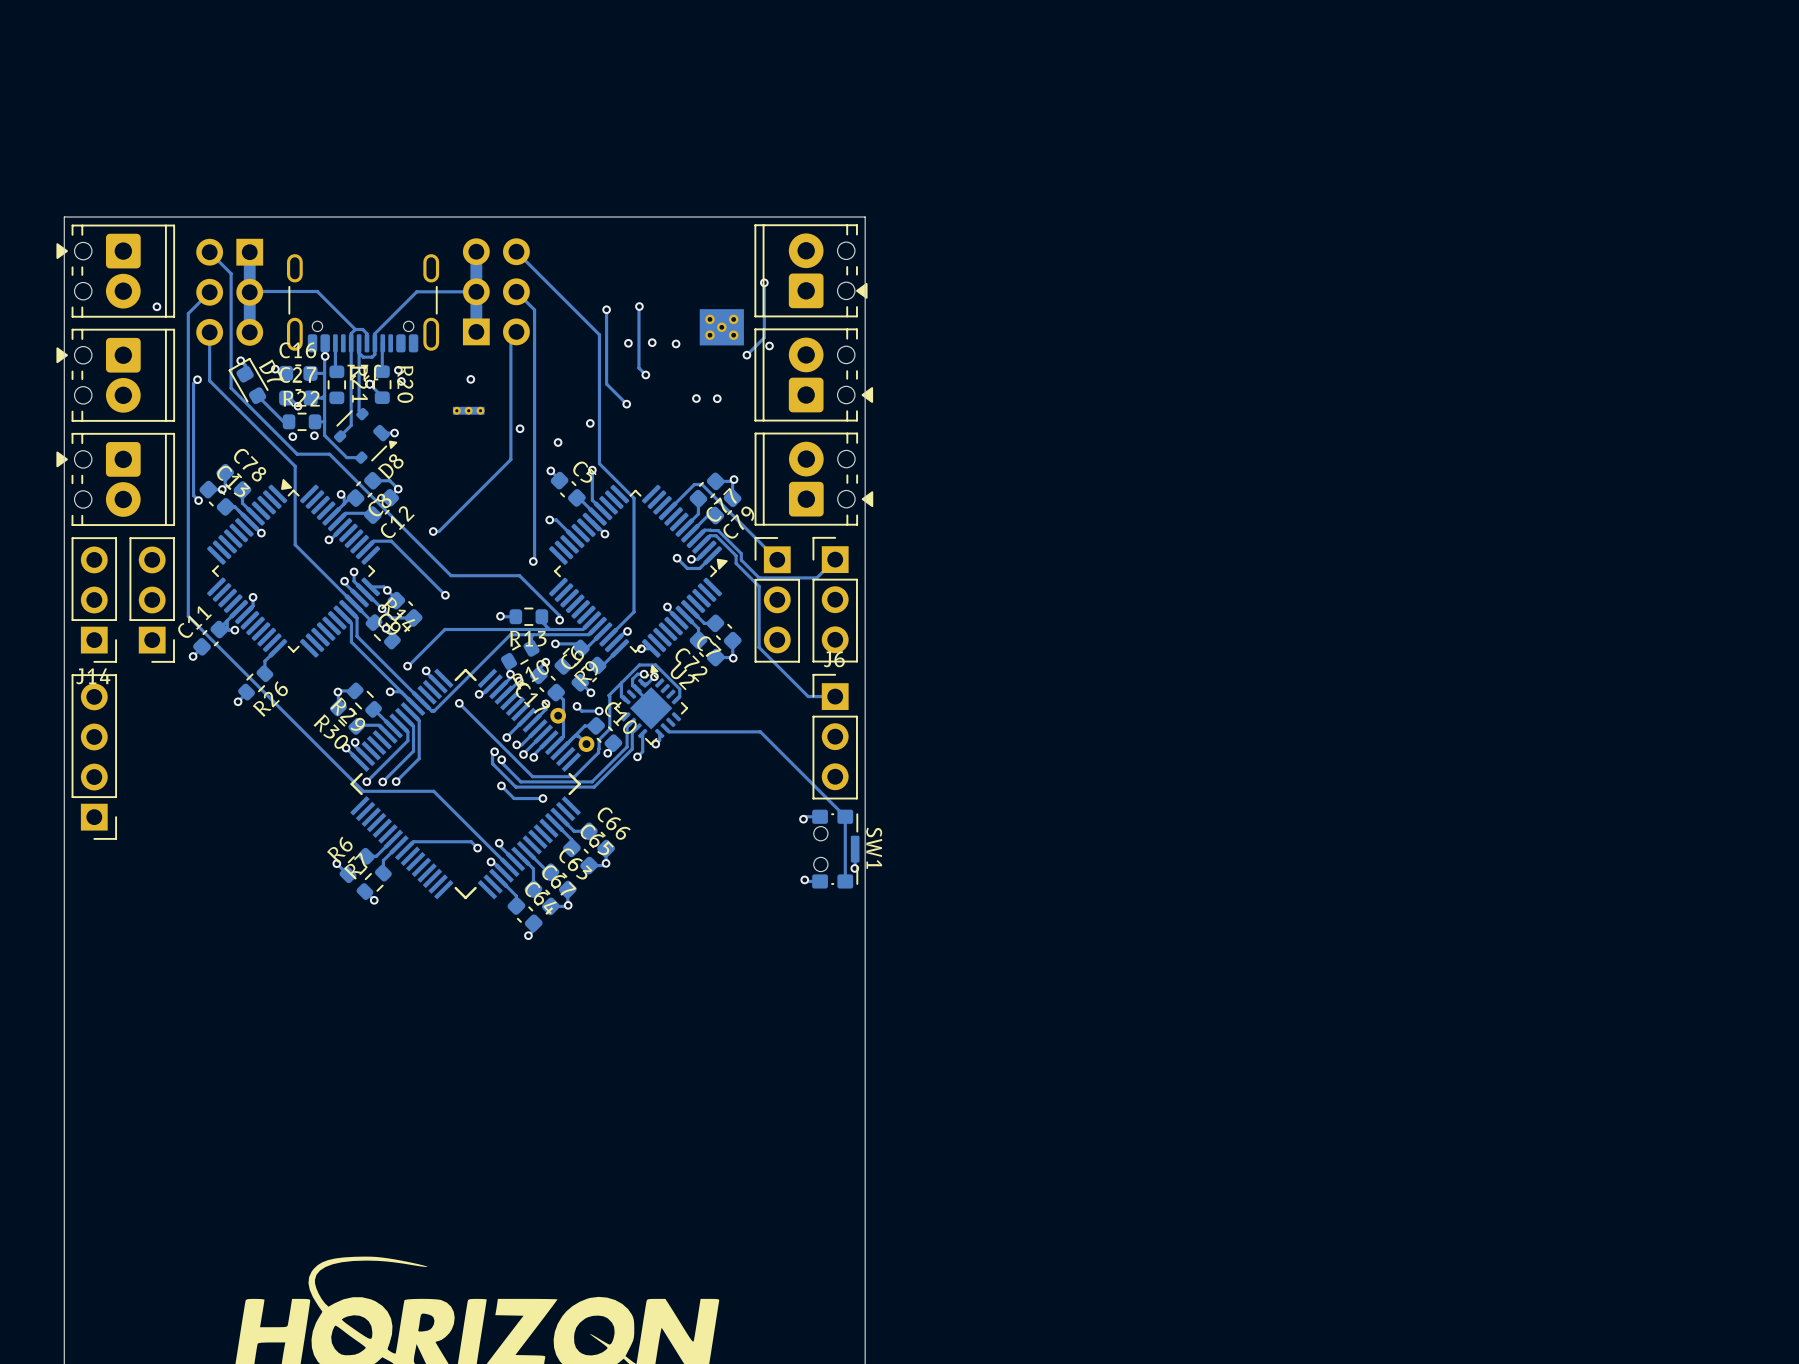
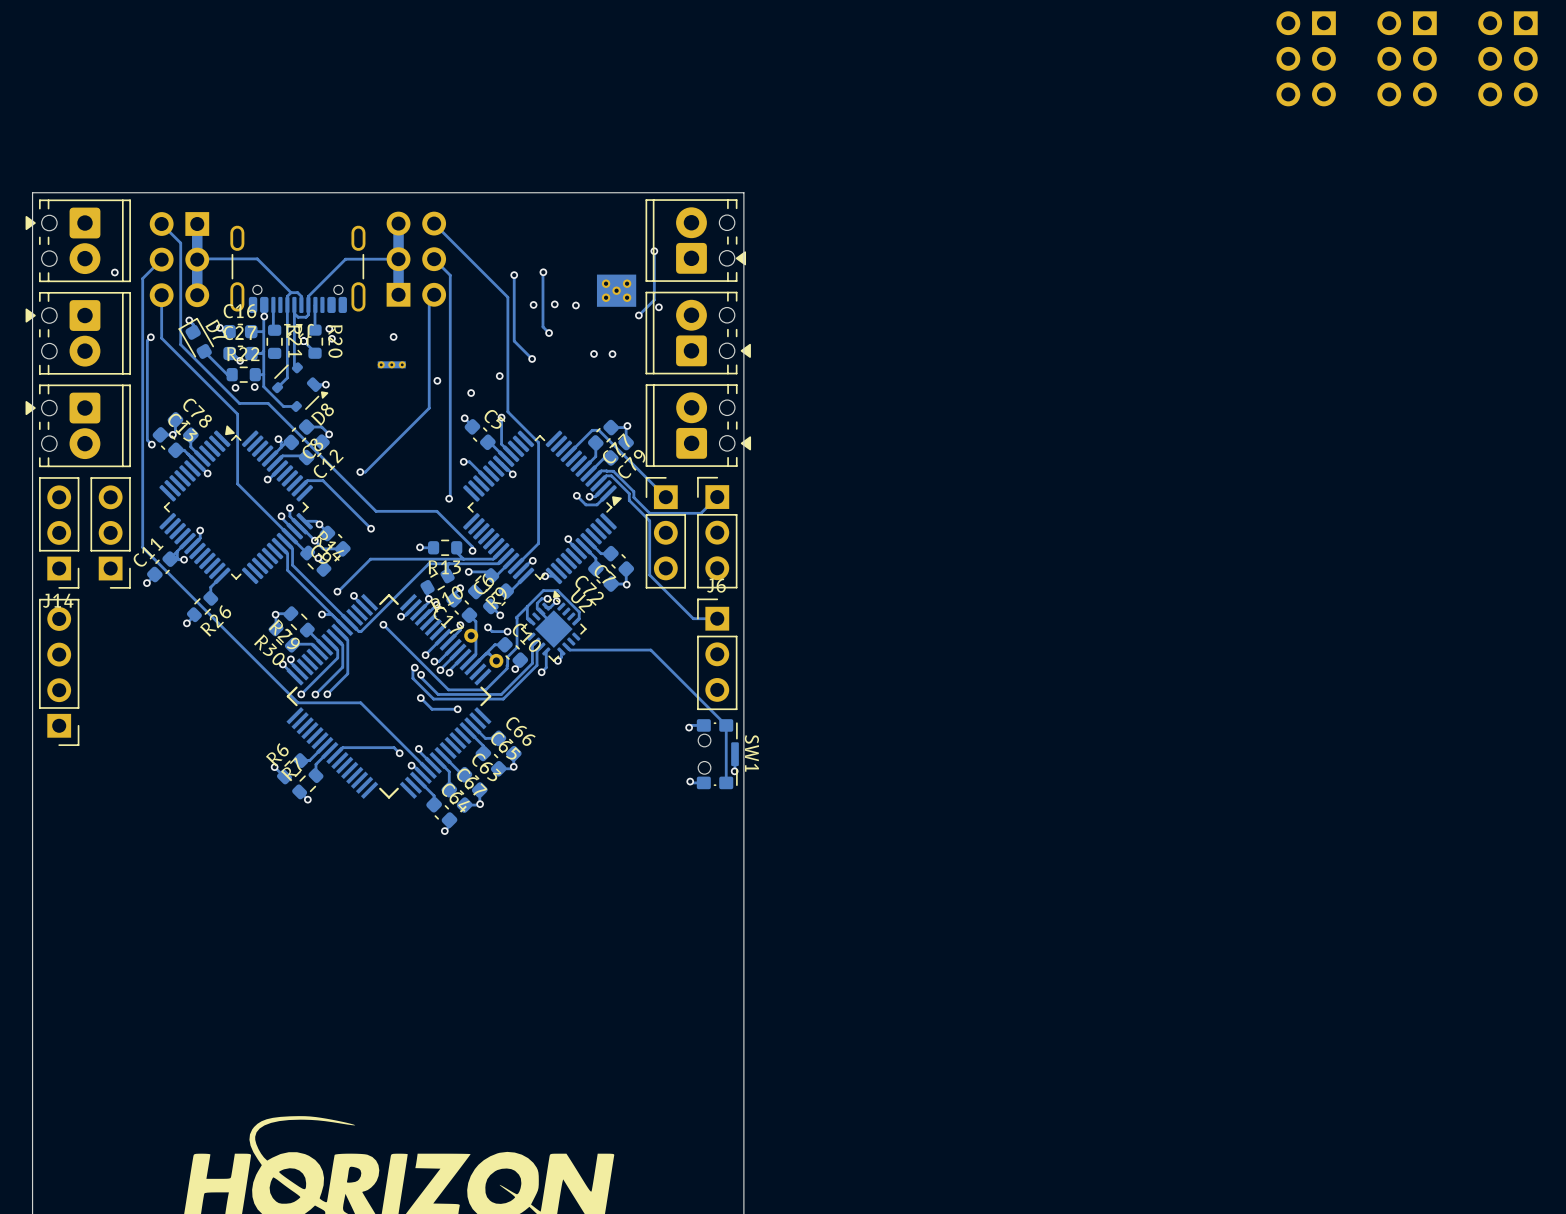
part: none -> (1306, 58)
part: none -> (1407, 58)
part: none -> (1507, 58)

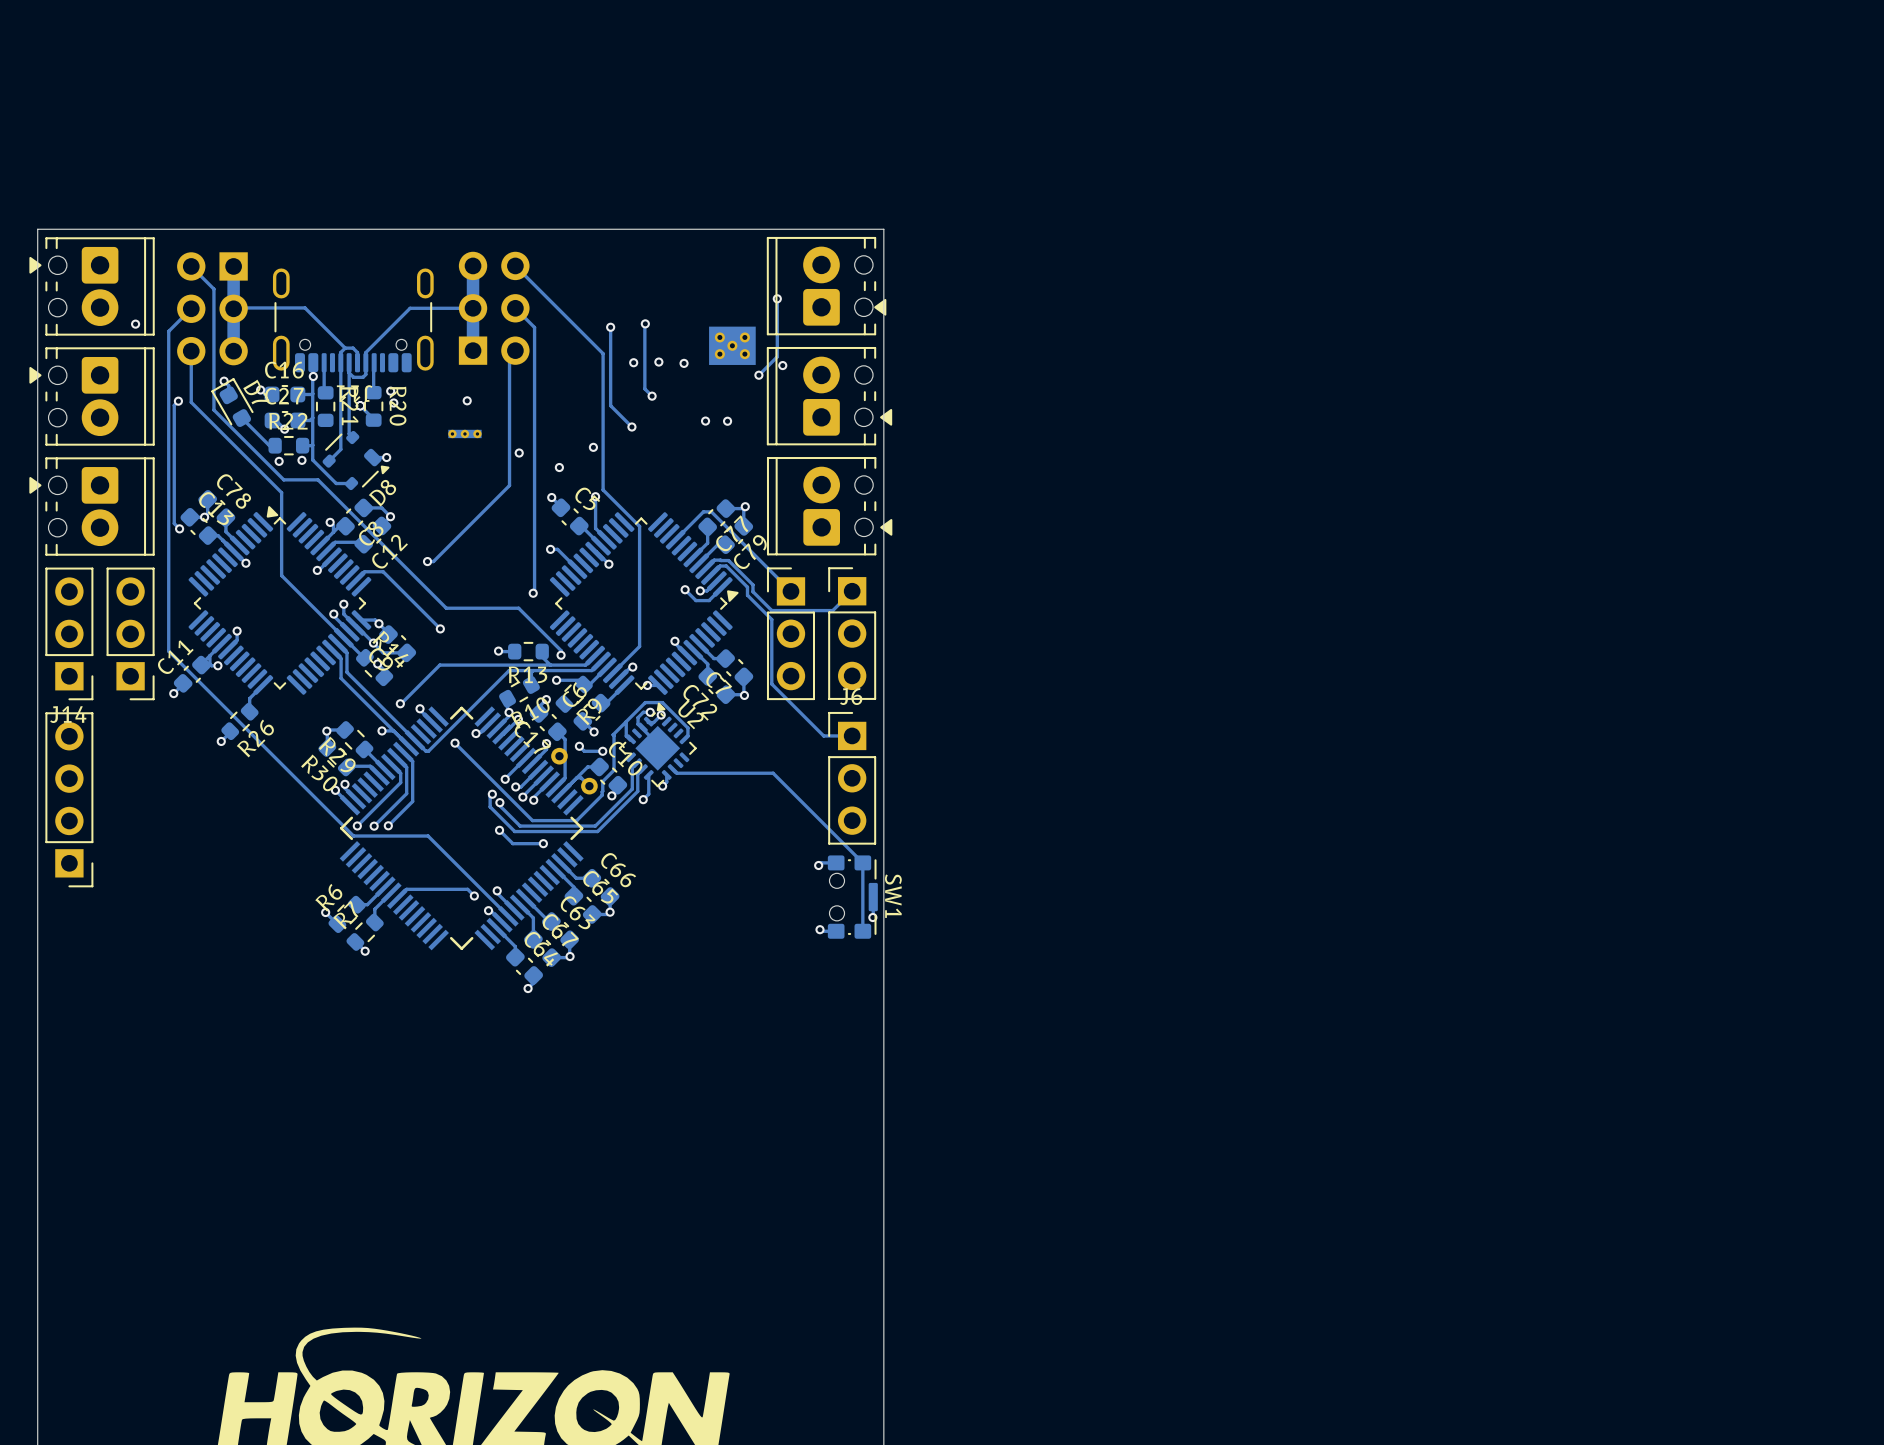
part: (1306, 58) -> none
part: (1407, 58) -> none
part: (1507, 58) -> none

